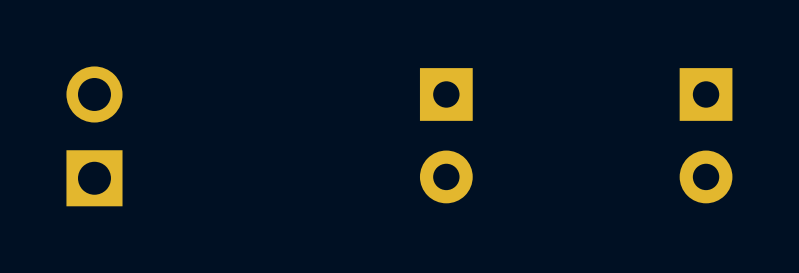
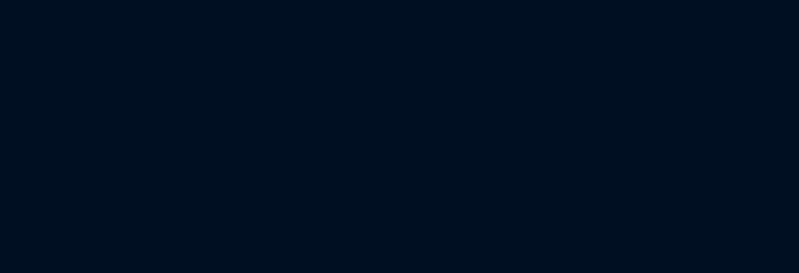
part: (446, 135) -> none
part: (706, 135) -> none
part: (94, 136) -> none

